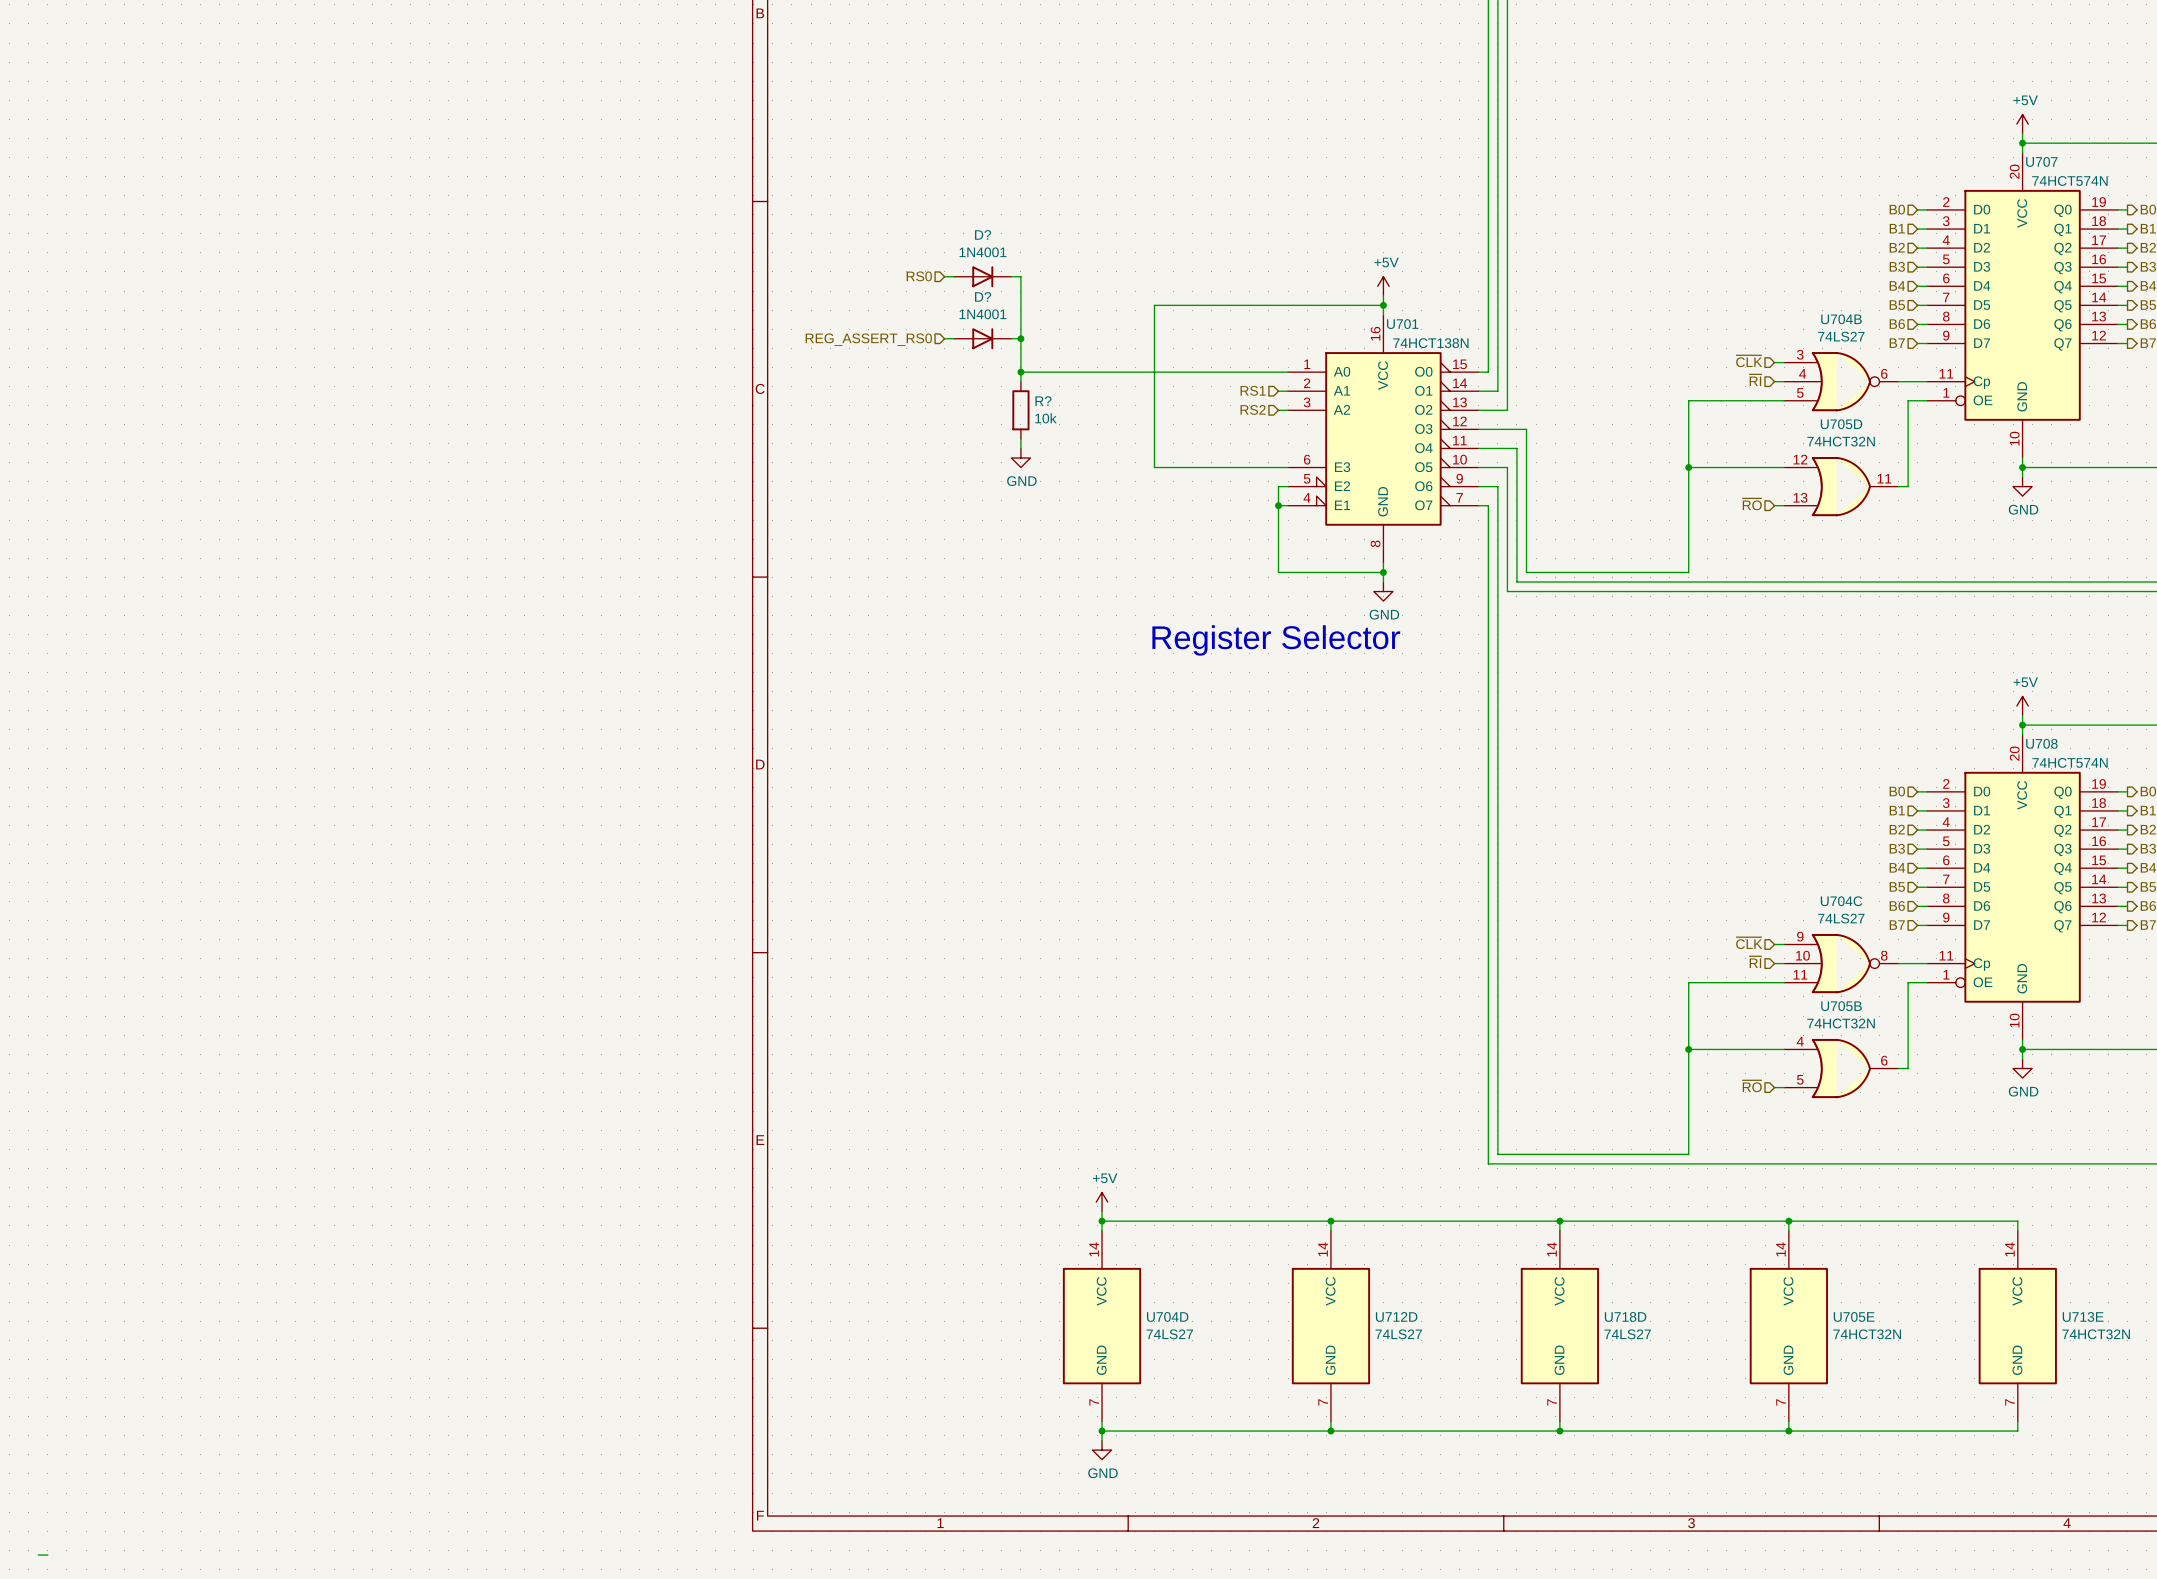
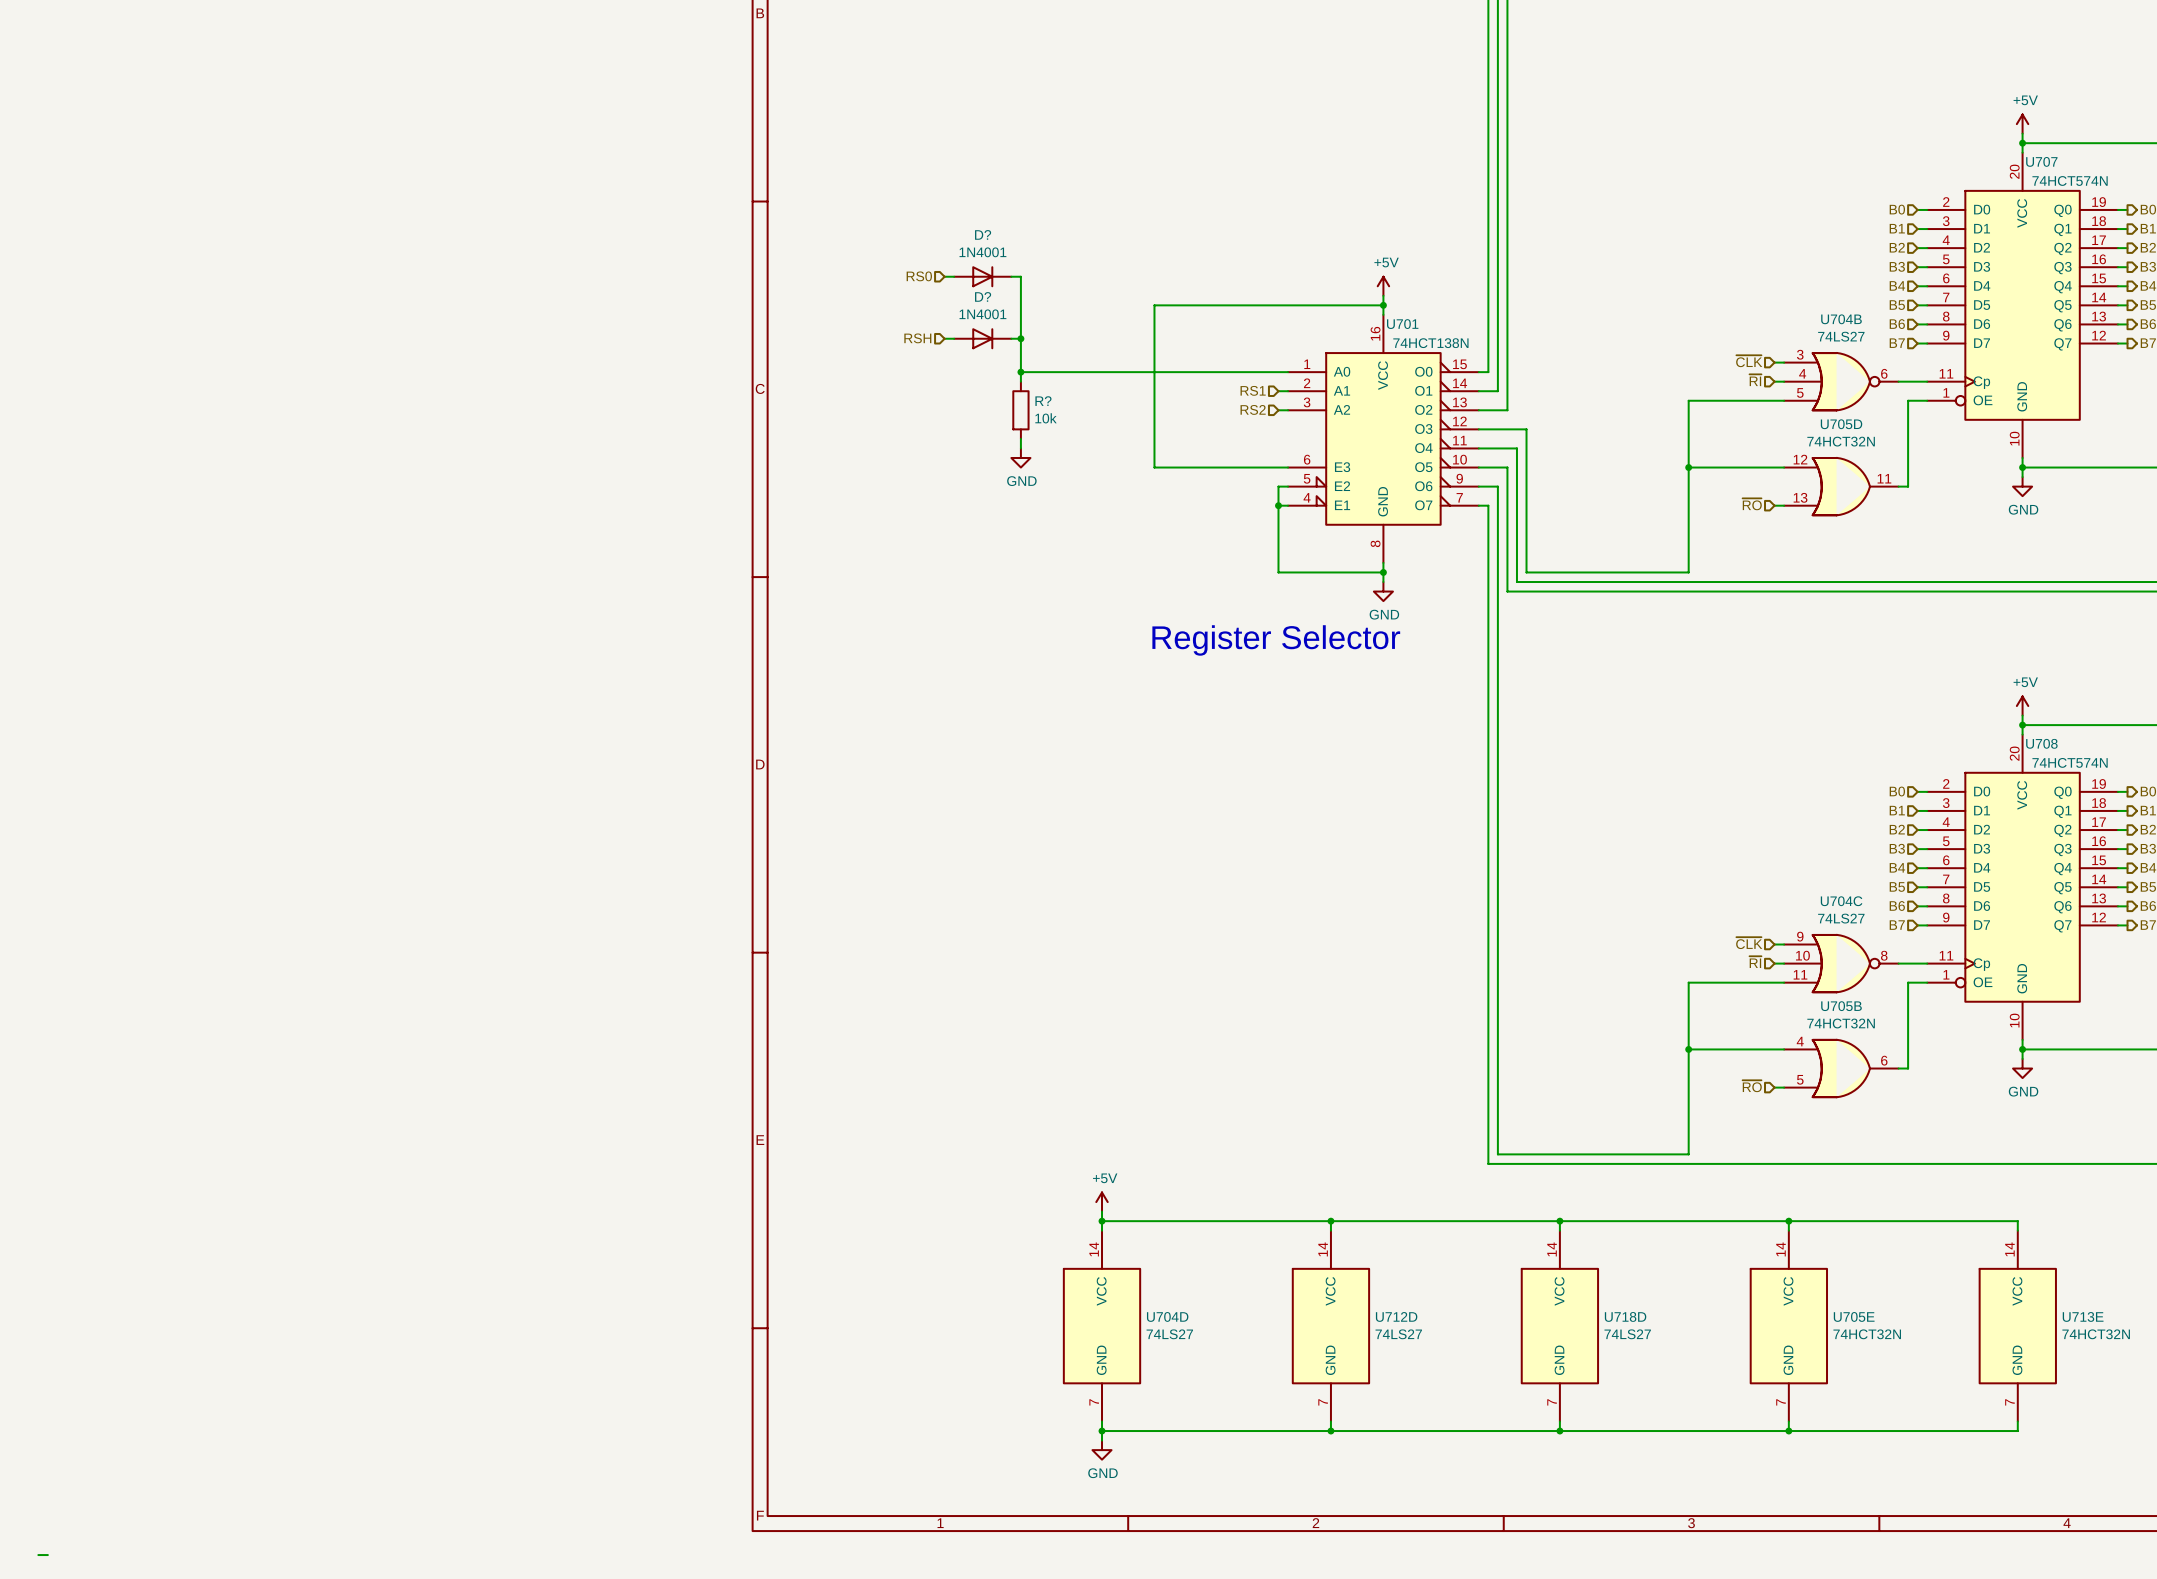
hierarchical label: REG_ASSERT_RS0 (868, 339) -> RSH (917, 338)

